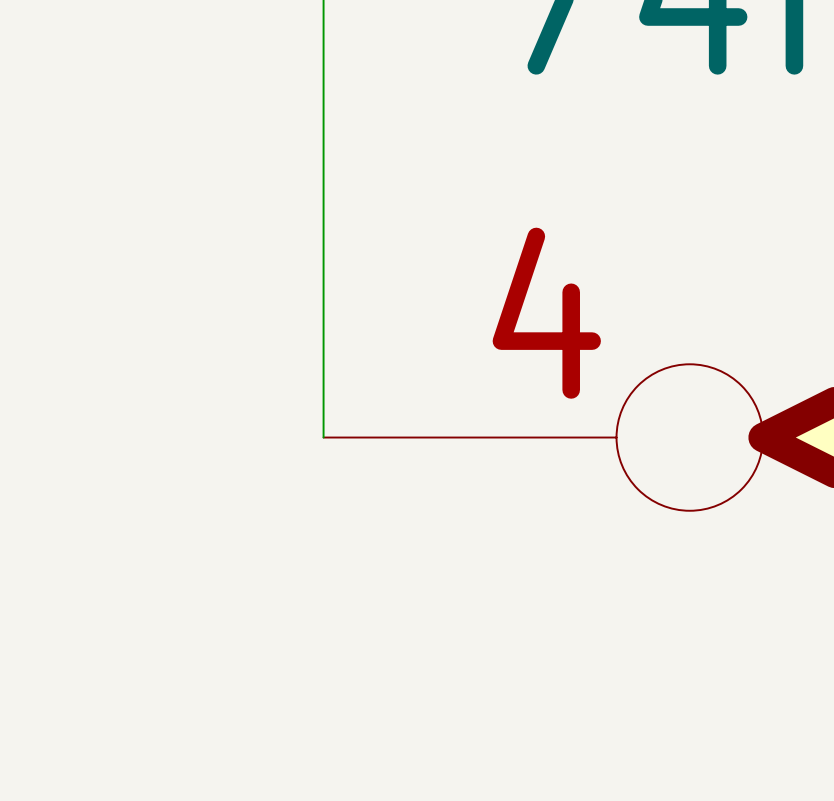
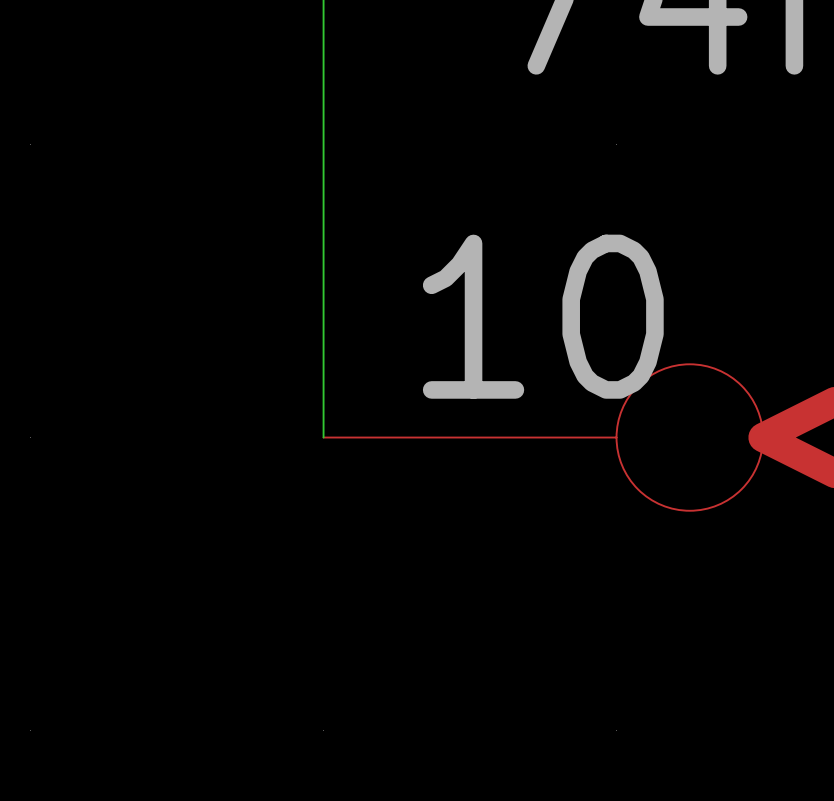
part pin number: 4 (546, 313) -> 10 (543, 316)

